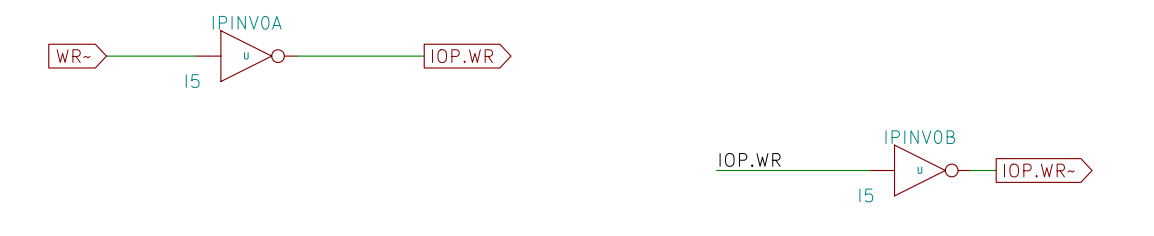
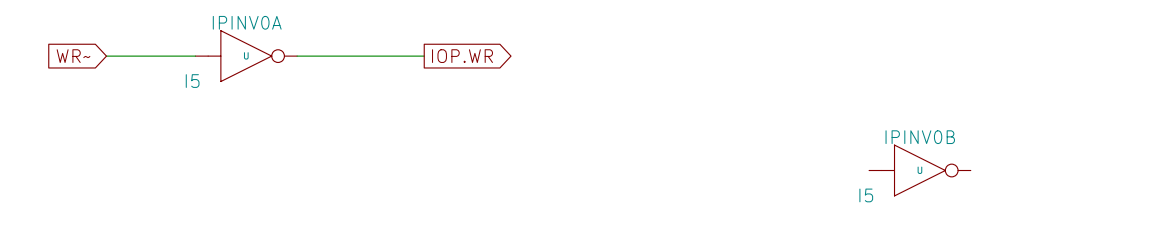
label: IOP.WR (750, 159) -> none
wire: (716, 170) (869, 170) -> none
wire: (970, 170) (996, 170) -> none
global label: IOP.WR~ (1039, 170) -> none

